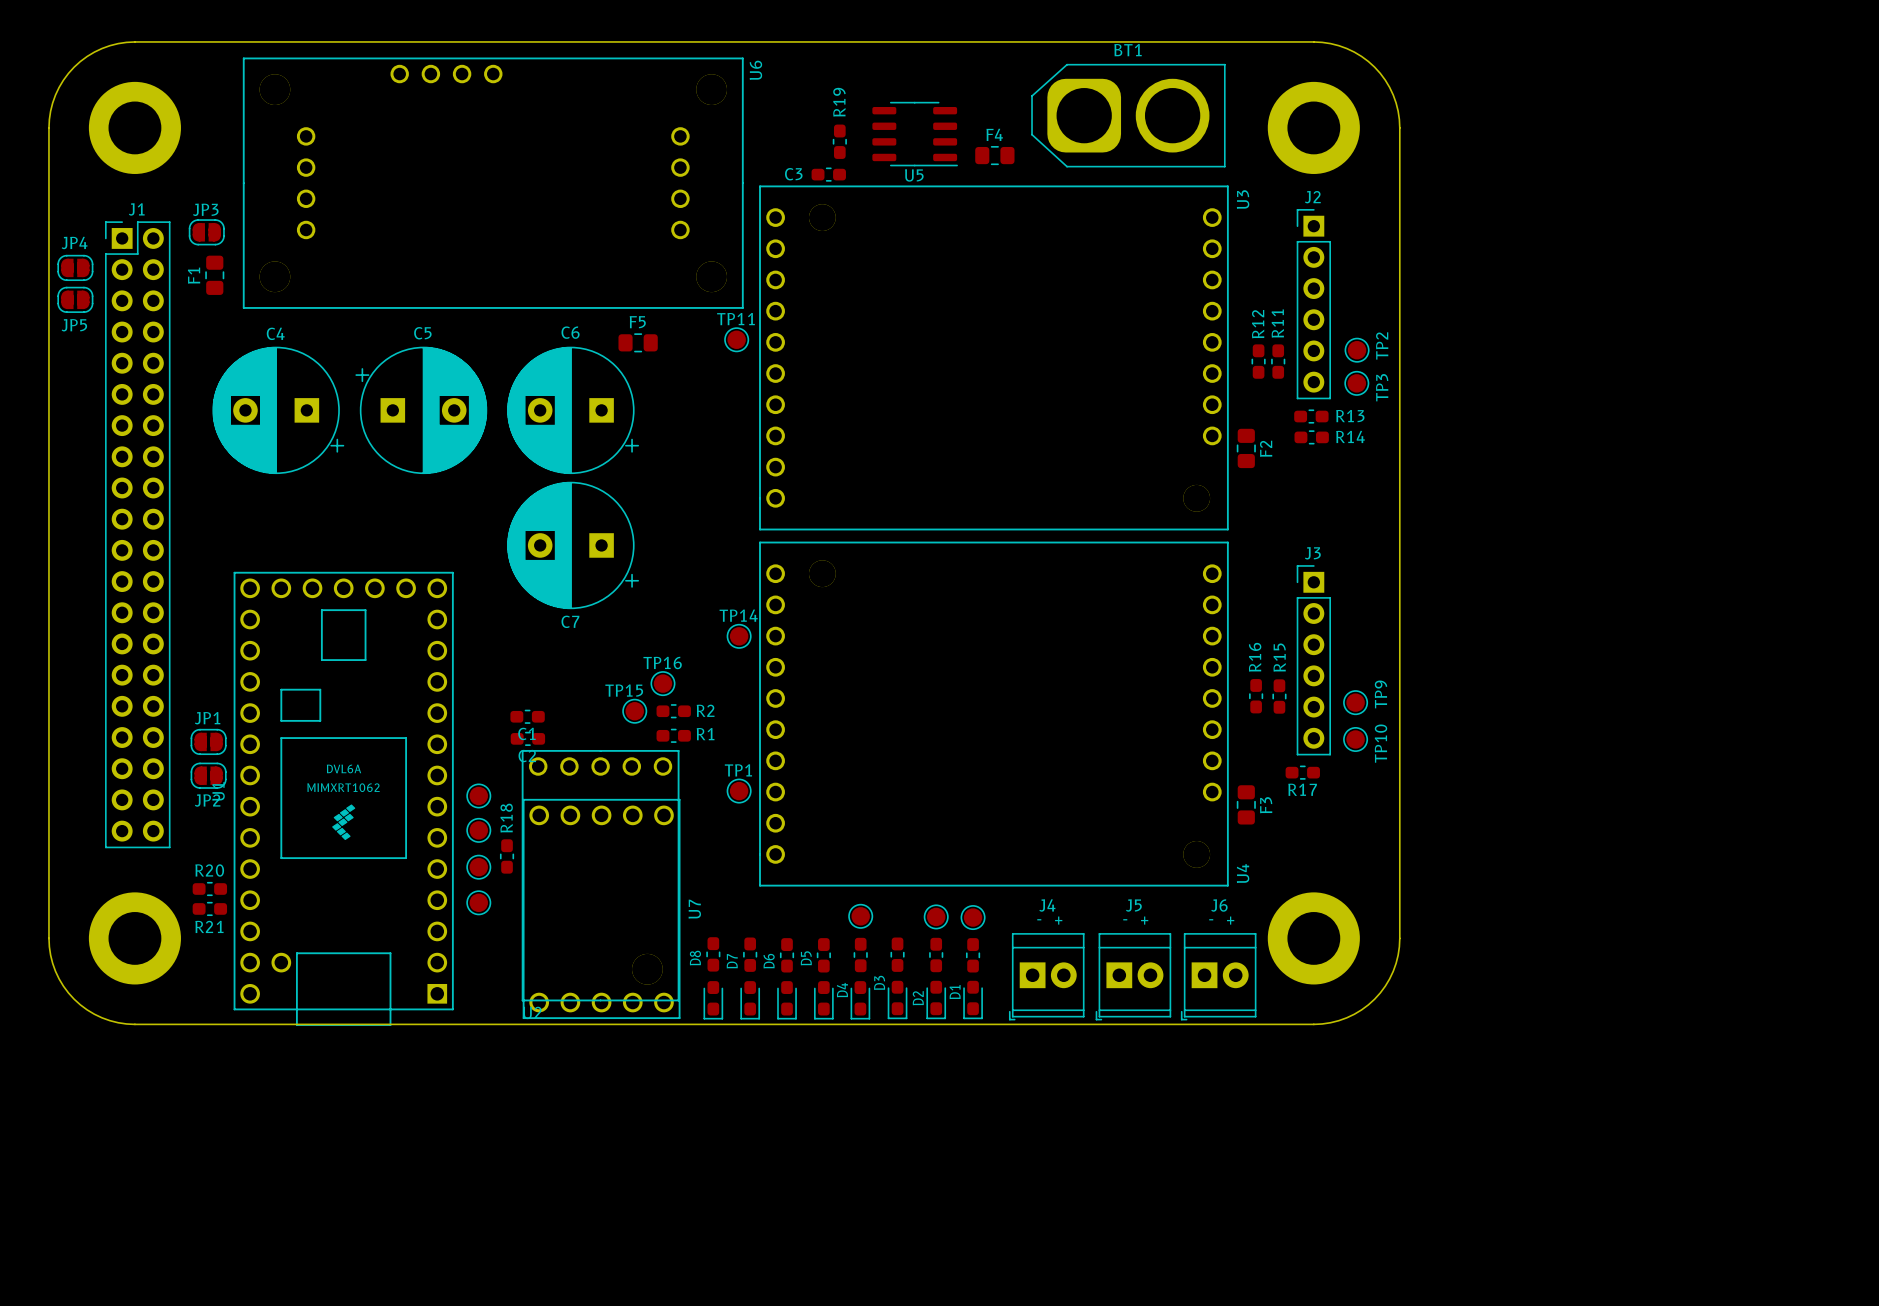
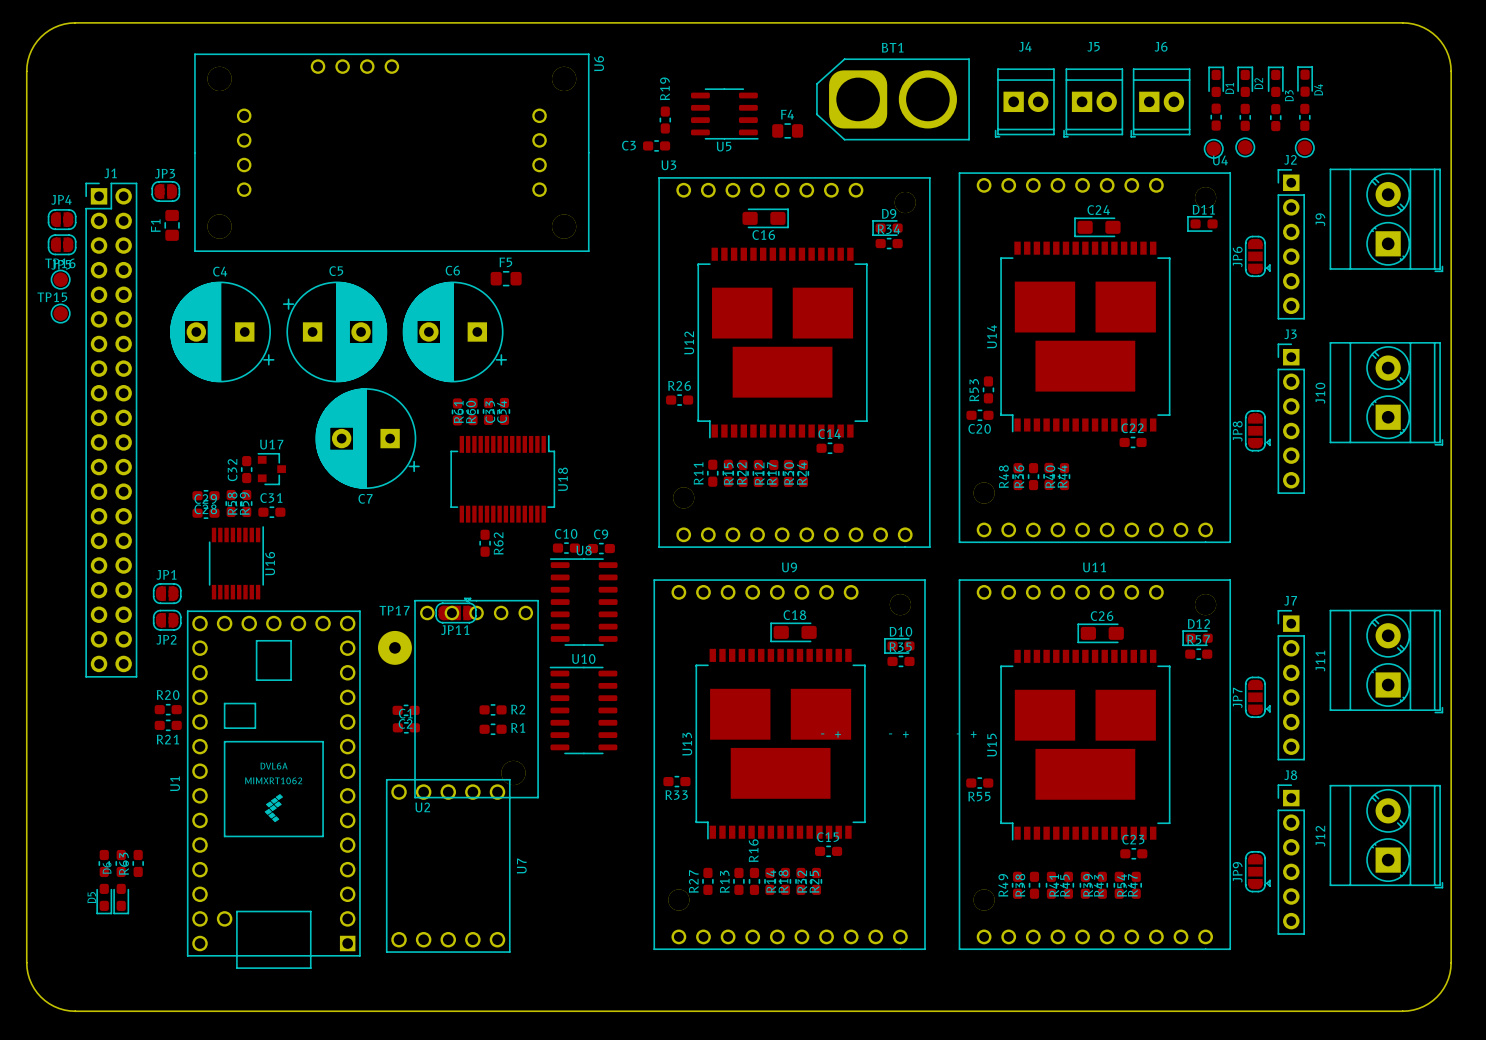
board edge: (134, 41) (1313, 41) (1338, 45) (1354, 52) (1368, 61) (1380, 73) (1389, 87) (1398, 111) (1399, 127) (1399, 938) (1398, 955) (1393, 971) (1380, 992) (1368, 1004) (1354, 1014) (1330, 1022) (1313, 1024) (134, 1024) (118, 1022) (102, 1017) (80, 1004) (68, 992) (59, 978) (50, 955) (48, 938) (49, 119) (52, 102) (59, 87) (68, 73) (80, 61) (102, 48) (118, 43) (134, 41) -> (75, 22) (54, 27) (40, 37) (29, 55) (26, 71) (26, 962) (27, 973) (34, 988) (49, 1003) (59, 1008) (75, 1011) (1402, 1011) (1418, 1008) (1428, 1003) (1443, 988) (1448, 978) (1451, 962) (1451, 71) (1446, 50) (1436, 37) (1428, 30) (1413, 24) (1402, 22) (75, 22)
part: (134, 127) -> none
part: (1313, 127) -> none
part: none -> (1216, 117)
part: none -> (1245, 117)
part: none -> (1275, 117)
part: none -> (1304, 117)
part: none -> (1245, 147)
part: none -> (1304, 147)
part: none -> (1213, 148)
C16: none -> (765, 218)
J9: none -> (1386, 220)
D11: none -> (1202, 223)
C24: none -> (1097, 227)
D9: none -> (887, 228)
R34: none -> (889, 243)
J2 position: (1313, 304) -> (1291, 244)
JP6: none -> (1257, 256)
R11 name position: R11 (1277, 323) -> R11 (698, 473)
R12 name position: R12 (1258, 324) -> R12 (759, 473)
TP11: (736, 339) -> none
TP2: (1357, 350) -> none
U3 rotation: 0° (993, 357) -> 90° counterclockwise (794, 362)
R12 position: (1258, 361) -> (773, 473)
R11 position: (1278, 361) -> (712, 473)
TP3: (1356, 383) -> none
R13 rotation: 0° (1311, 416) -> 90° clockwise (738, 881)
R13 position: (1311, 416) -> (738, 881)
R13 name position: R13 (1350, 416) -> R13 (724, 881)
U14: none -> (1085, 336)
U12: none -> (782, 342)
R14 name position: R14 (1350, 436) -> R14 (771, 881)
R14 rotation: 0° (1311, 437) -> 90° clockwise (785, 881)
R14 position: (1311, 437) -> (785, 881)
F2: (1246, 448) -> none
R53: none -> (988, 389)
J10: none -> (1386, 393)
R26: none -> (679, 400)
R60: none -> (457, 411)
R61: none -> (472, 411)
C34: none -> (488, 411)
C33: none -> (504, 411)
C20: none -> (979, 415)
JP8: none -> (1257, 430)
C7 position: (573, 545) -> (367, 438)
C22: none -> (1133, 442)
C14: none -> (830, 448)
C32: none -> (246, 469)
U17: none -> (271, 469)
R22: none -> (728, 473)
R24: none -> (788, 473)
R30: none -> (803, 473)
R48: none -> (1018, 476)
R36: none -> (1033, 476)
R44: none -> (1049, 476)
R40: none -> (1064, 476)
U18: none -> (502, 478)
C28: none -> (206, 495)
R59: none -> (231, 503)
R58: none -> (246, 503)
TP14: (739, 636) -> none
C31: none -> (271, 512)
C29: none -> (206, 513)
R15 name position: R15 (1279, 657) -> R15 (728, 473)
J3 position: (1313, 660) -> (1291, 418)
R62: none -> (485, 543)
TP16 position: (662, 683) -> (60, 279)
C10: none -> (566, 548)
C9: none -> (601, 548)
R16 position: (1256, 696) -> (754, 881)
R15 position: (1279, 696) -> (743, 473)
U16: none -> (236, 562)
TP9: (1355, 702) -> none
TP15 position: (634, 711) -> (60, 313)
R2 position: (673, 711) -> (493, 709)
U4 rotation: 0° (993, 714) -> 90° counterclockwise (1094, 357)
U4 position: (993, 714) -> (1094, 357)
C1 position: (527, 716) -> (406, 727)
C1 name position: C1 (526, 733) -> C1 (405, 713)
R1 position: (673, 735) -> (493, 729)
C2 position: (527, 738) -> (406, 710)
TP10: (1355, 739) -> none
U8: none -> (583, 602)
JP11: none -> (456, 610)
R17 rotation: 0° (1302, 772) -> 90° clockwise (758, 473)
R17 position: (1302, 772) -> (758, 473)
R17 name position: R17 (1302, 789) -> R17 (771, 473)
TP1: (739, 791) -> none
C18: none -> (793, 632)
C26: none -> (1100, 633)
part: (478, 795) -> none
U1 position: (343, 798) -> (273, 789)
D12: none -> (1197, 638)
F3: (1246, 804) -> none
D10: none -> (899, 645)
TP17: none -> (394, 647)
R18 name position: R18 (506, 818) -> R18 (783, 881)
R57: none -> (1198, 654)
R35: none -> (901, 661)
J11: none -> (1386, 661)
part: (478, 830) -> none
R18 position: (507, 856) -> (769, 881)
J7: none -> (1291, 685)
part: (478, 867) -> none
JP7: none -> (1257, 697)
U10: none -> (583, 710)
part: (478, 902) -> none
U7 position: (601, 908) -> (448, 865)
part: (860, 916) -> none
part: (936, 916) -> none
part: (973, 917) -> none
U13: none -> (780, 744)
U15: none -> (1085, 745)
part: (134, 938) -> none
part: (1313, 938) -> none
part: (713, 954) -> none
part: (750, 954) -> none
part: (897, 954) -> none
part: (787, 955) -> none
part: (823, 955) -> none
part: (860, 955) -> none
part: (936, 955) -> none
part: (973, 955) -> none
D5 name position: D5 (806, 958) -> D5 (91, 897)
U9: none -> (789, 764)
U11: none -> (1094, 764)
J4 position: (1046, 976) -> (1024, 103)
J5 position: (1133, 976) -> (1093, 103)
J6 position: (1218, 976) -> (1160, 103)
R33: none -> (676, 781)
R55: none -> (979, 783)
D3 rotation: 0° (897, 999) -> 180° (1275, 81)
D3 position: (897, 999) -> (1275, 81)
D2 rotation: 0° (936, 999) -> 180° (1245, 81)
D2 position: (936, 999) -> (1245, 81)
D1 rotation: 0° (973, 999) -> 180° (1216, 81)
D1 position: (973, 999) -> (1216, 81)
D8: (713, 1000) -> none
D7: (750, 1000) -> none
D6 position: (787, 1000) -> (121, 898)
D5 position: (823, 1000) -> (104, 898)
D4 rotation: 0° (860, 1000) -> 180° (1305, 81)
D4 position: (860, 1000) -> (1305, 81)
J12: none -> (1386, 836)
C15: none -> (828, 851)
C23: none -> (1133, 853)
J8: none -> (1291, 859)
part: none -> (104, 863)
part: none -> (121, 863)
R63: none -> (138, 863)
JP9: none -> (1257, 871)
R27: none -> (707, 881)
R25: none -> (800, 881)
R32: none -> (816, 881)
R49: none -> (1017, 885)
R38: none -> (1034, 885)
R45: none -> (1051, 885)
R41: none -> (1068, 885)
R43: none -> (1085, 885)
R39: none -> (1102, 885)
R47: none -> (1119, 885)
R54: none -> (1136, 885)

